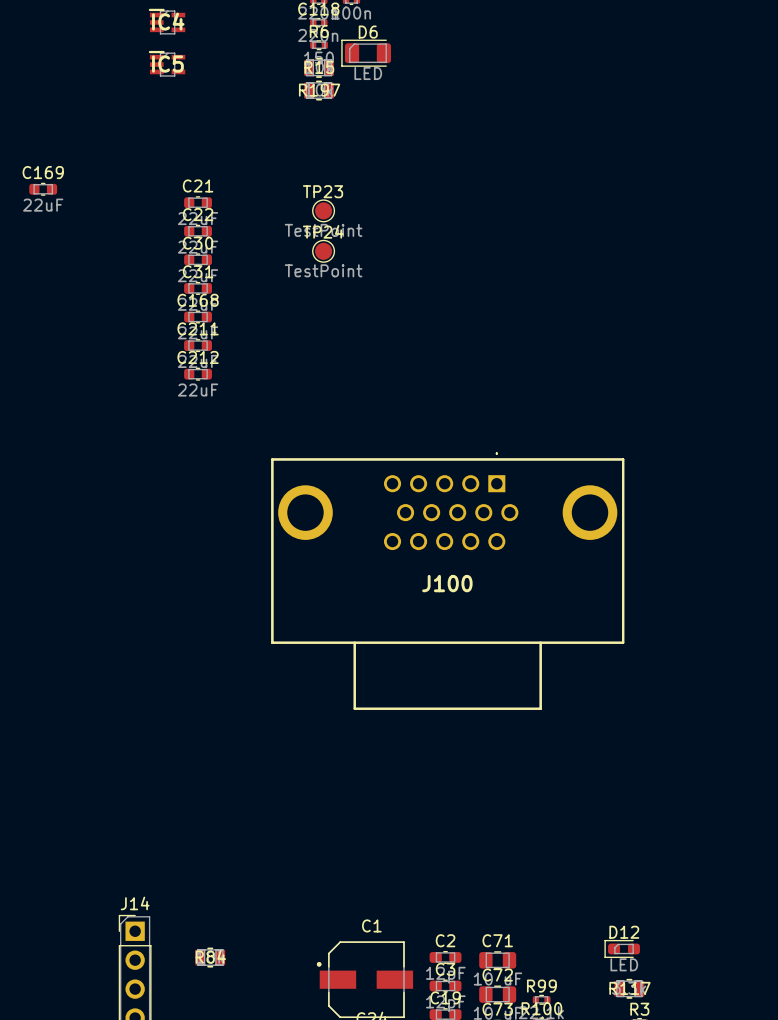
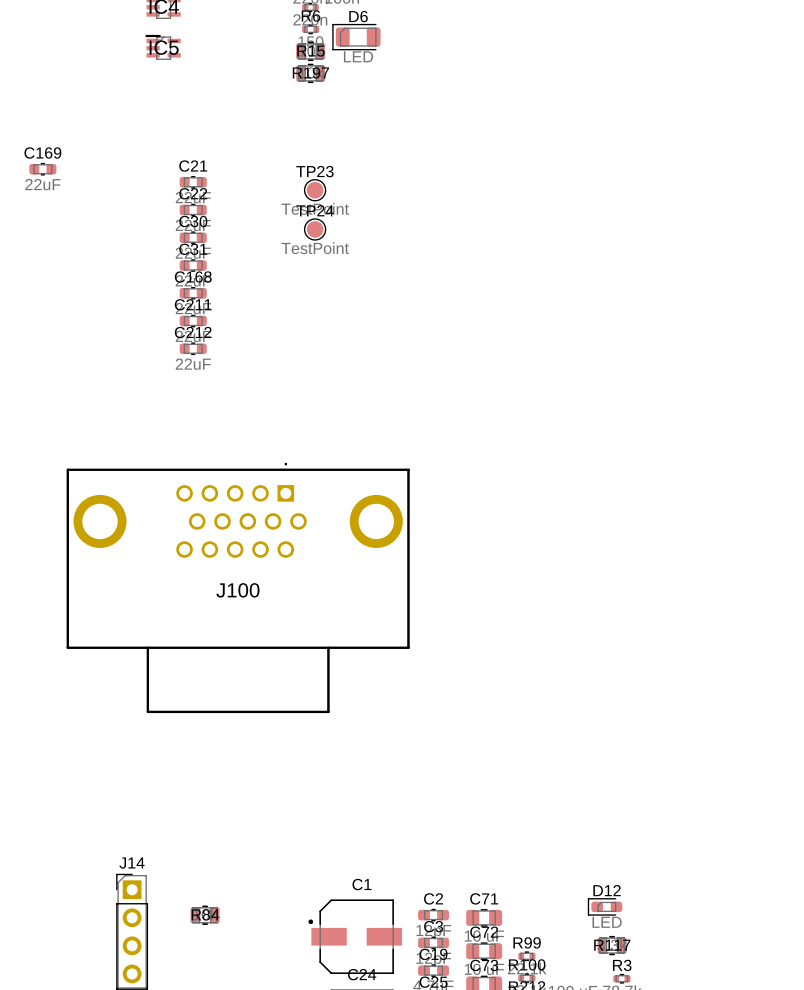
J100 position: (447, 581) -> (238, 588)

